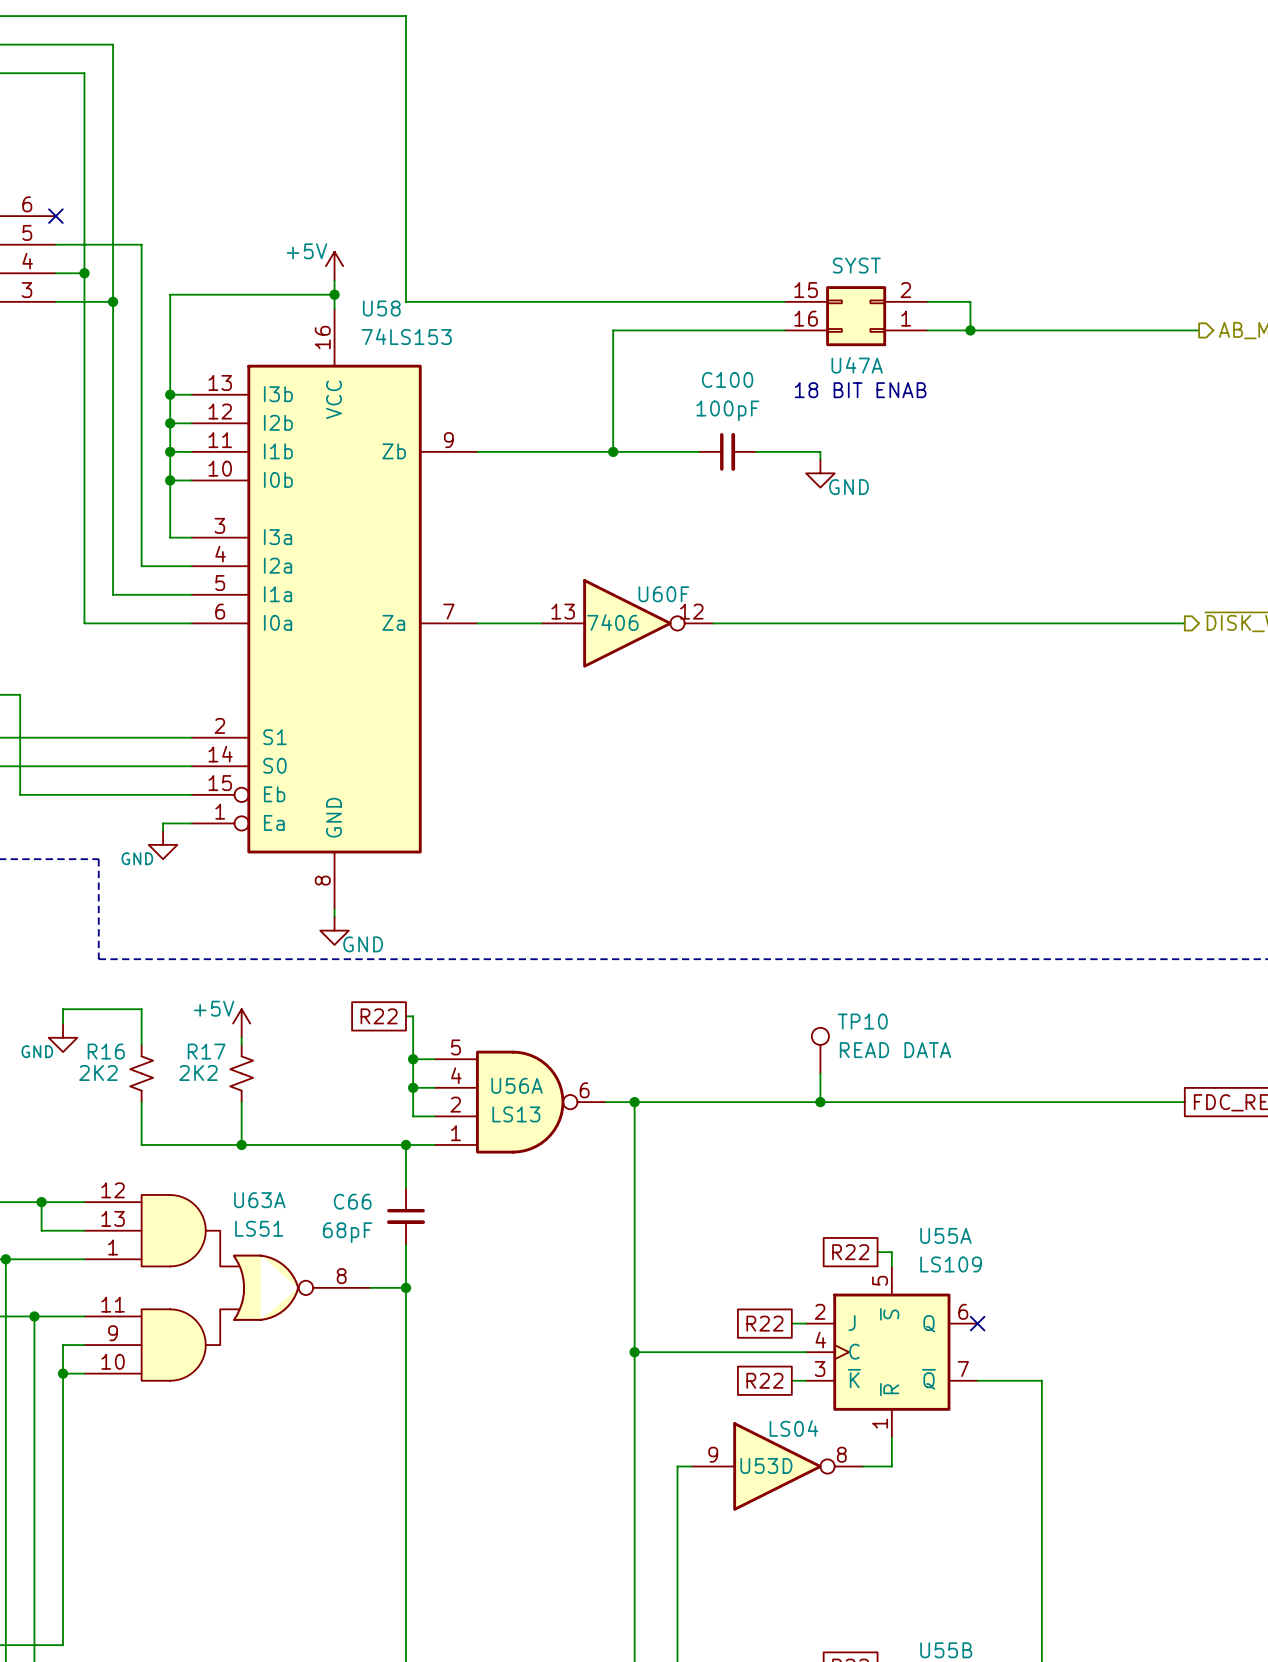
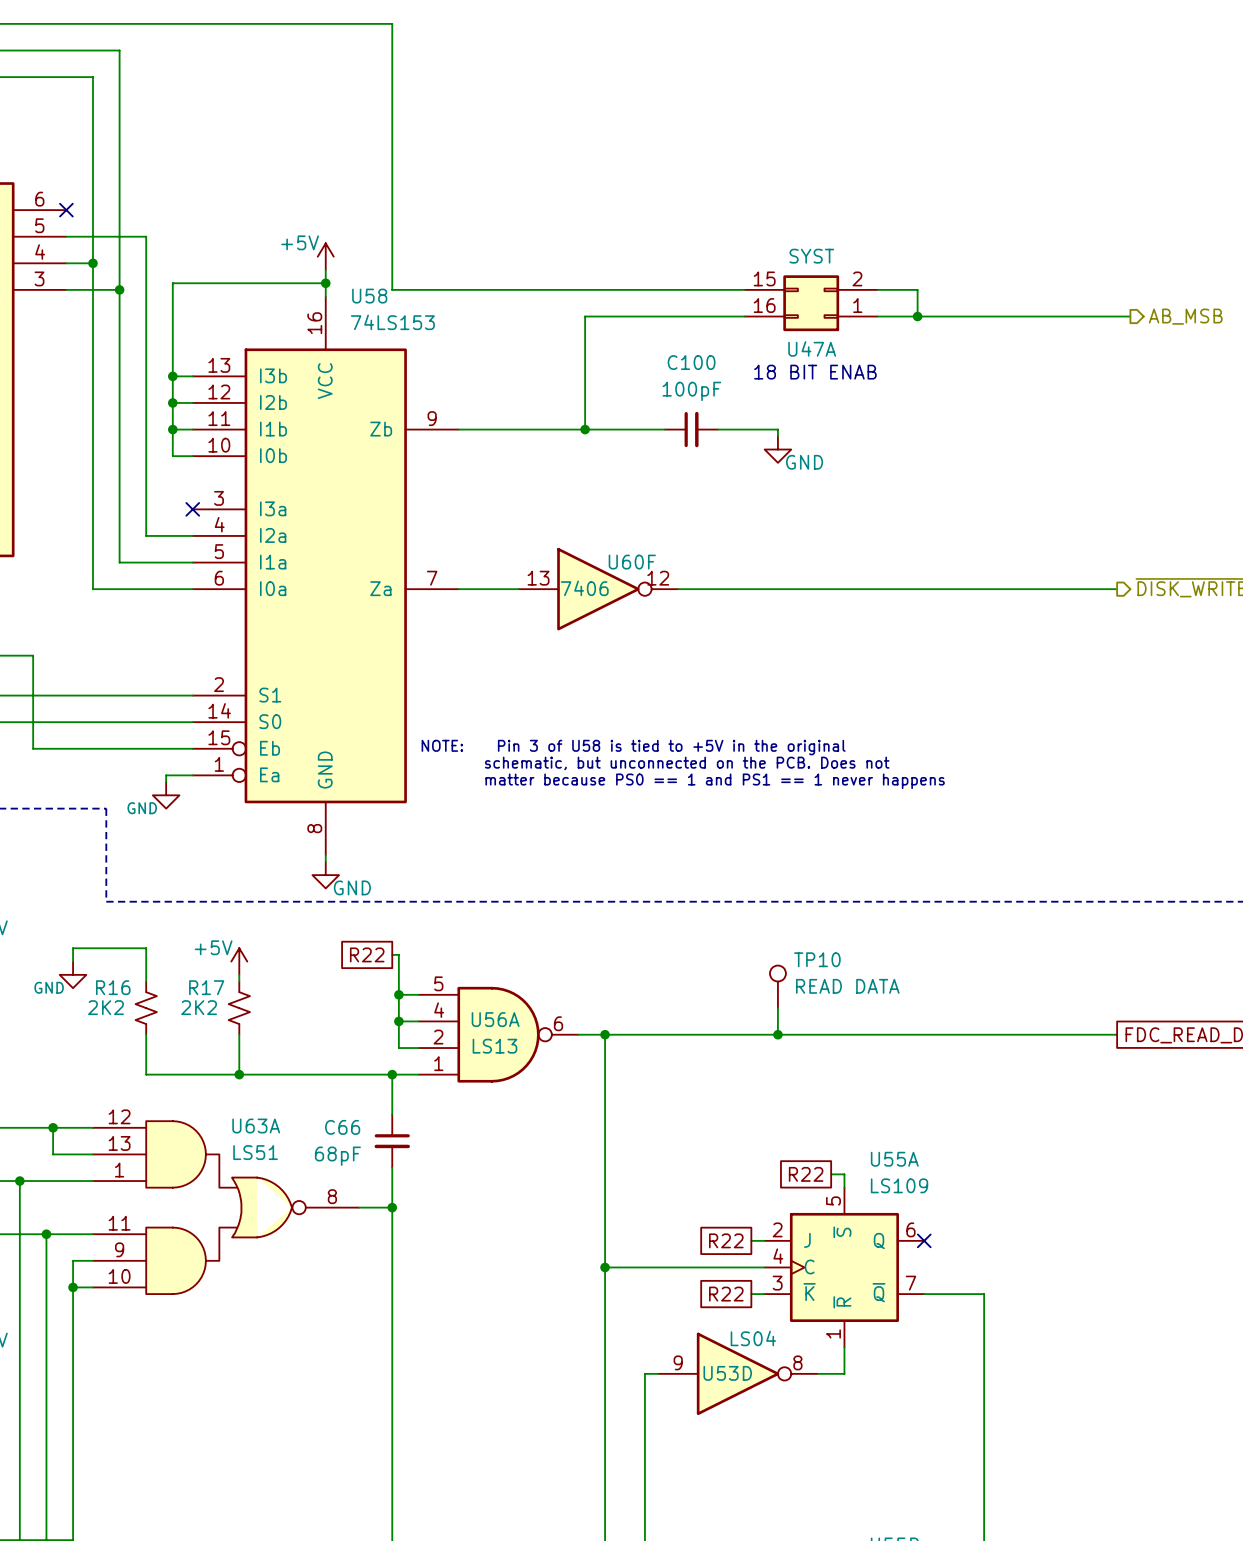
wire: (170, 480) (170, 537) (191, 537) -> none
junction: (170, 480) -> none
no-connect mark: none -> (192, 509)
text: none -> NOTE: Pin 3 of U58 is tied to +5V in the original (633, 747)
text: none -> schematic, but unconnected on the PCB. Does not (687, 763)
text: none -> matter because PS0 == 1 and PS1 == 1 never happens (715, 781)

